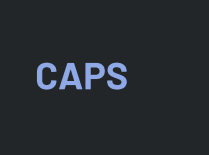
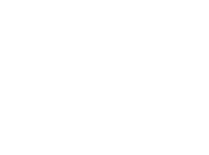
text: CAPS (81, 76) -> none

